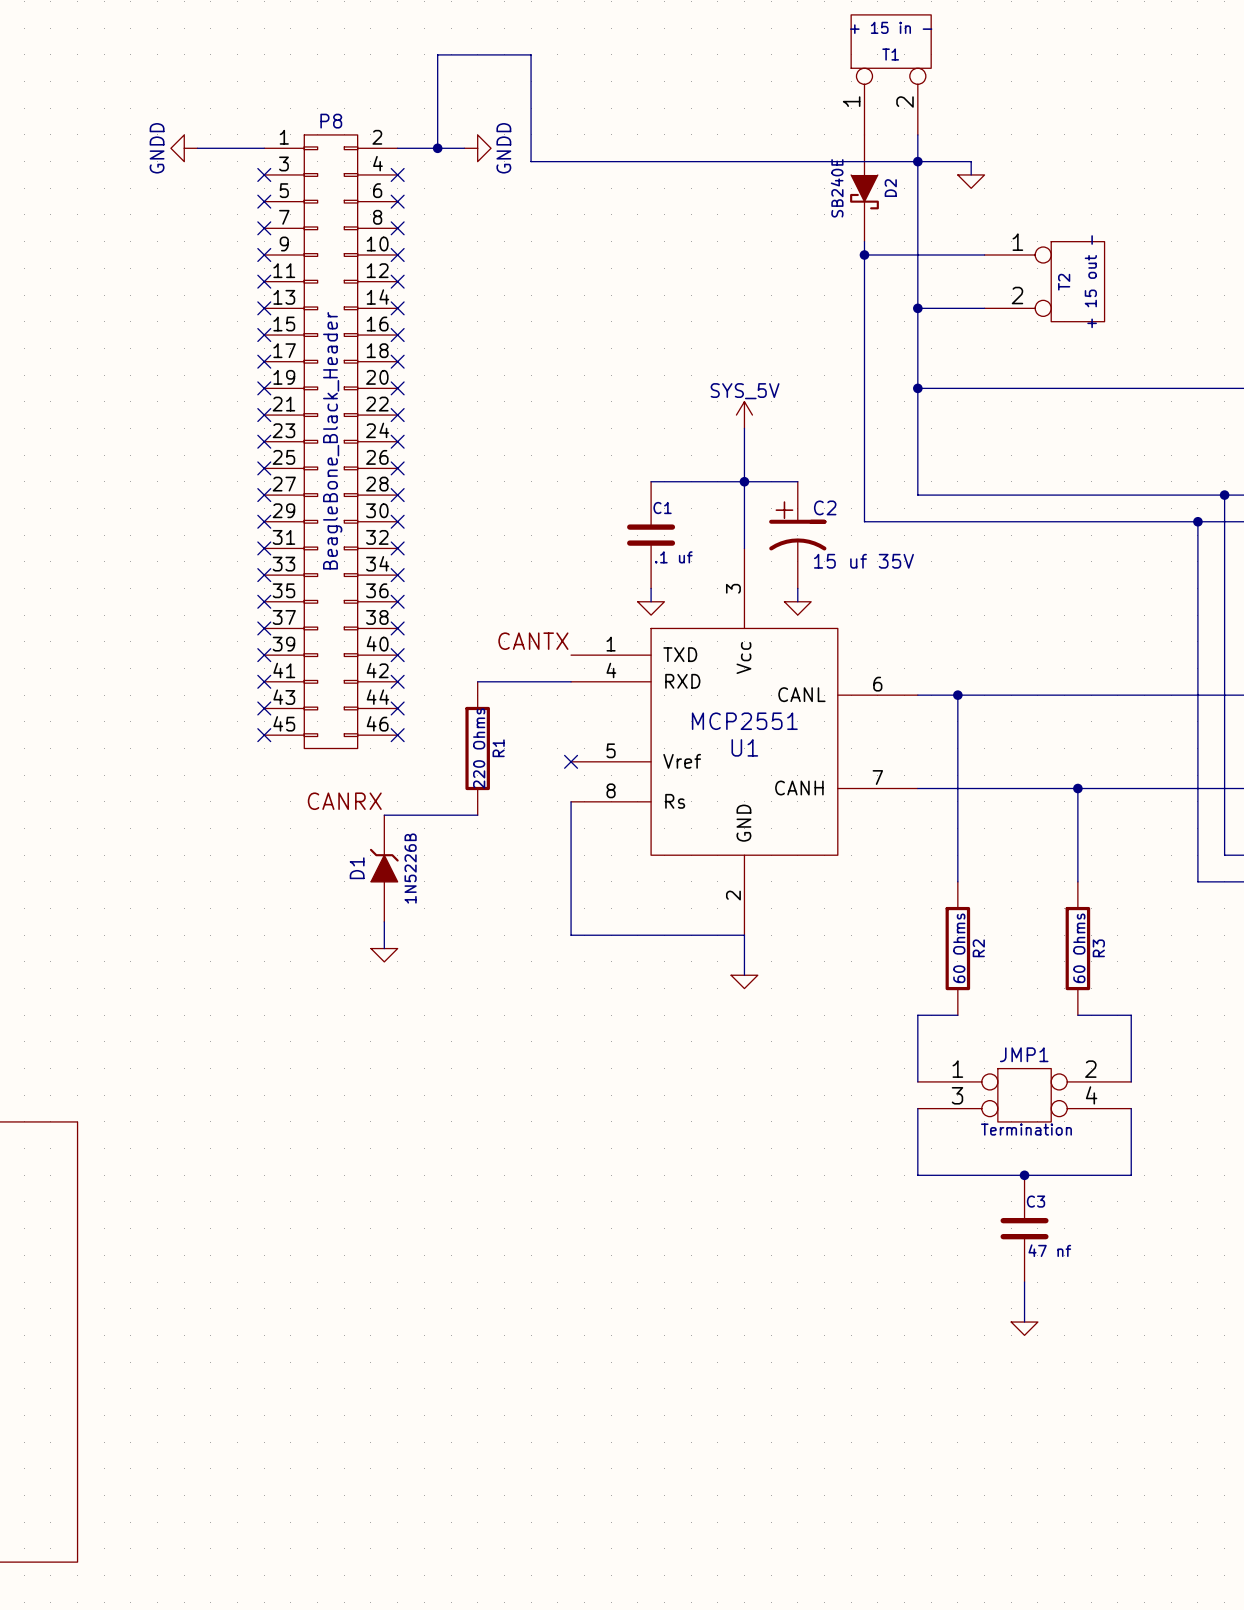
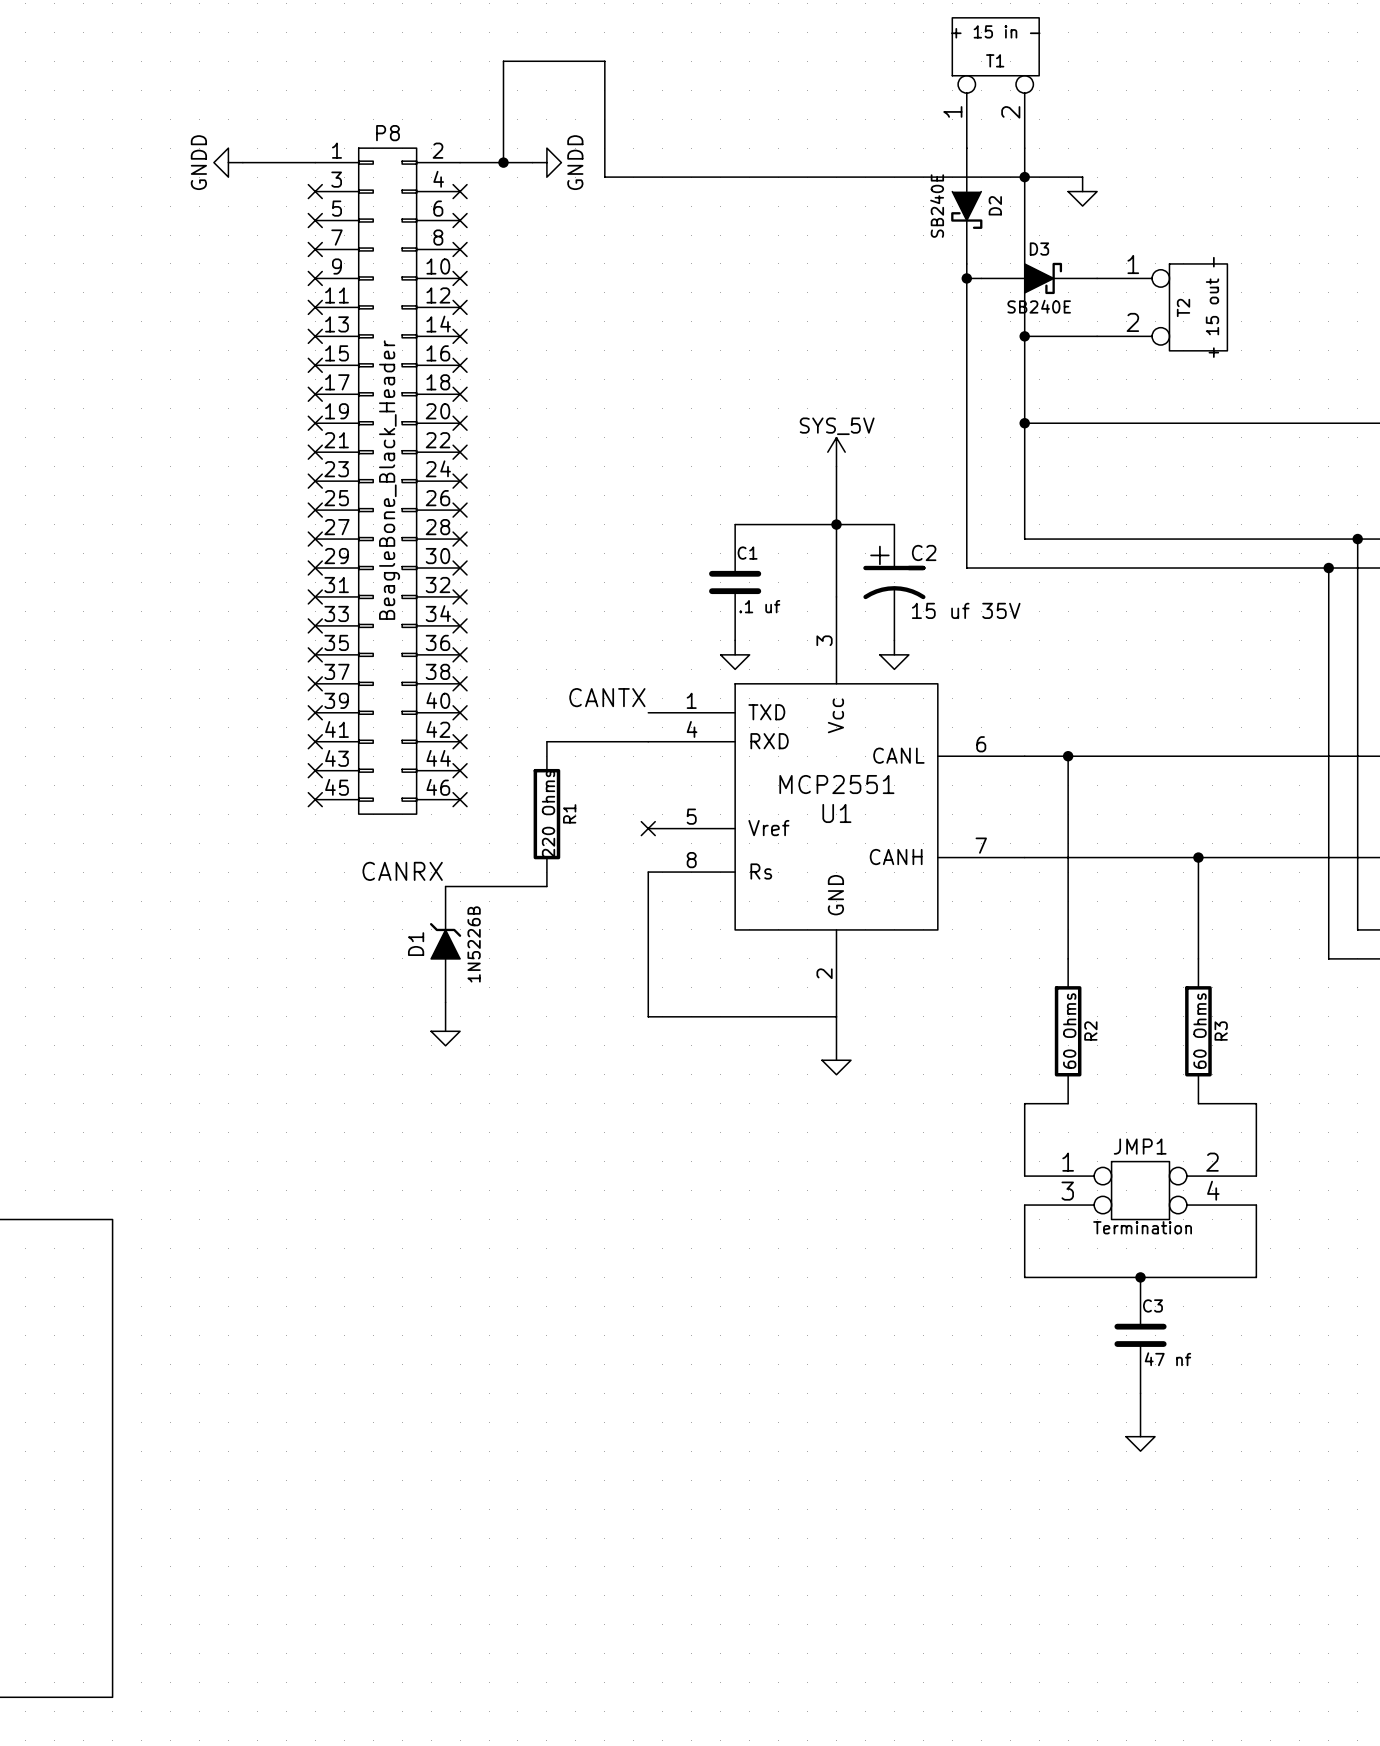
D3: none -> SB240E (1039, 278)

